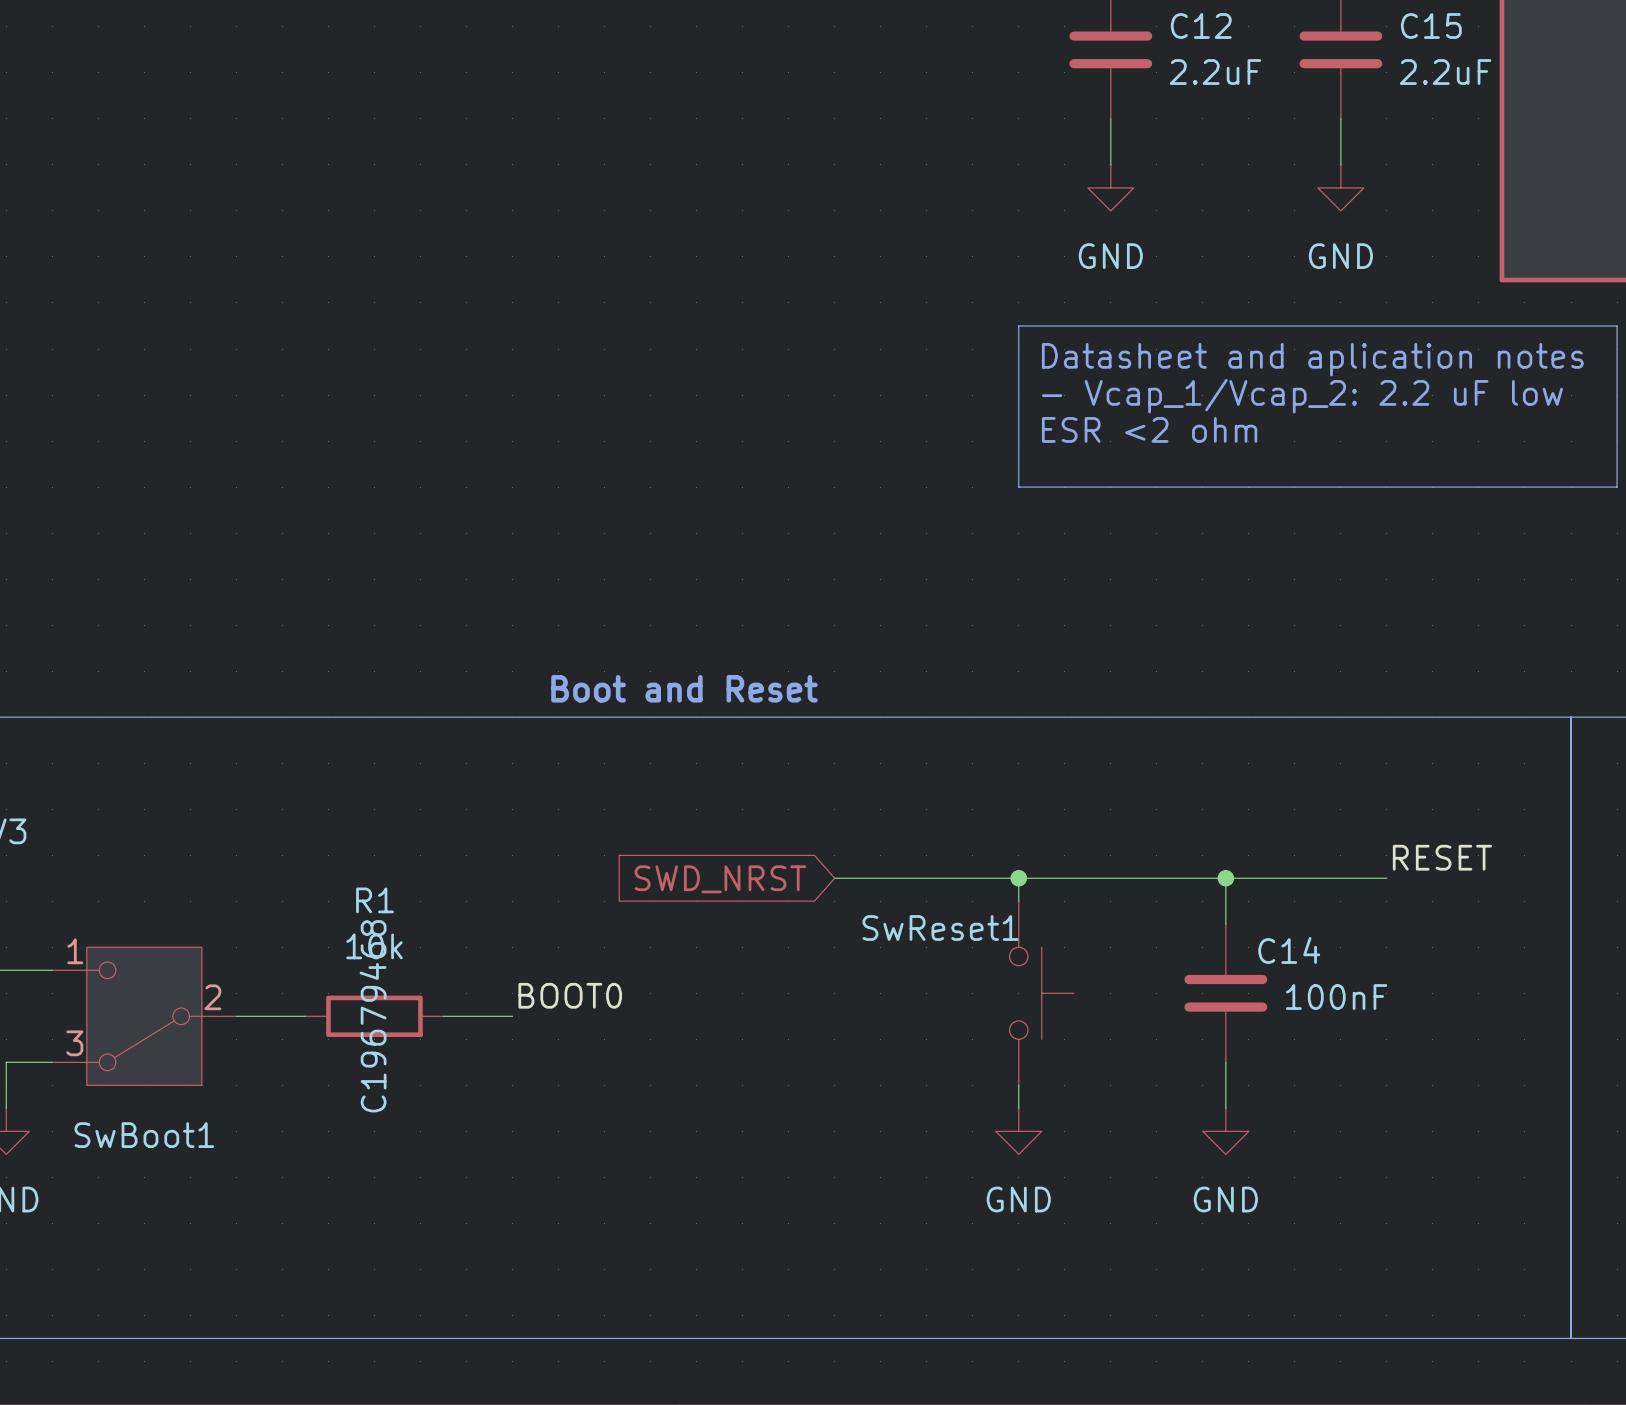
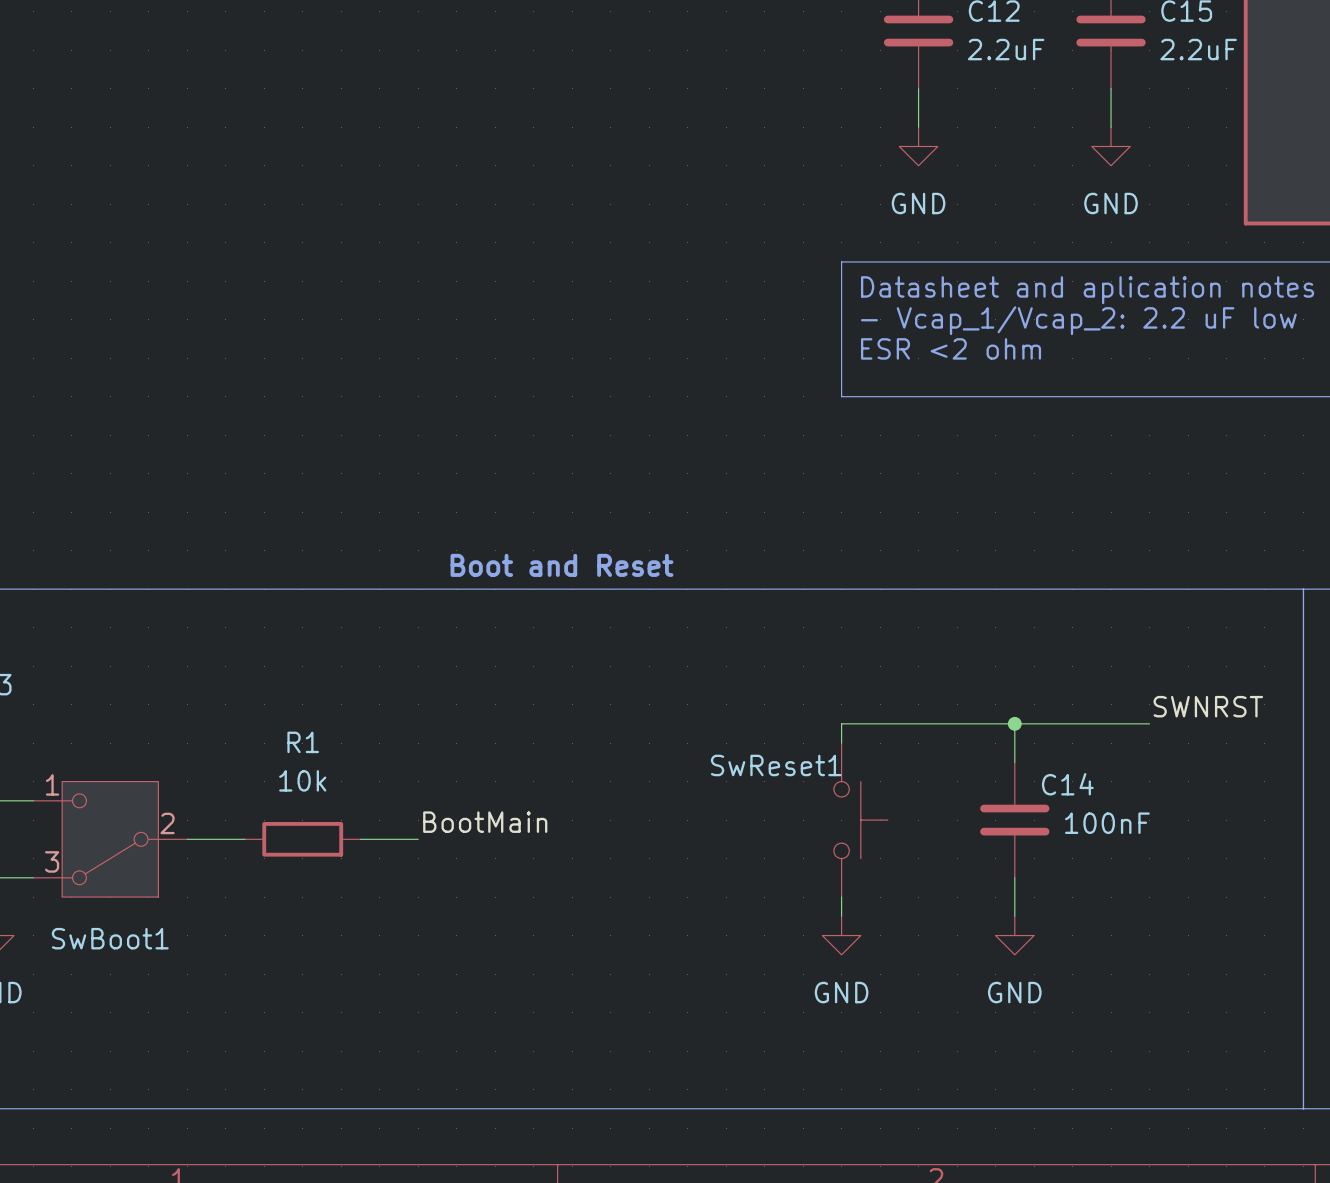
label: RESET (1442, 857) -> SWNRST (1208, 706)
wire: (834, 878) (1018, 878) -> none
junction: (1018, 878) -> none
global label: SWD_NRST (720, 879) -> none
label: BOOT0 (570, 995) -> BootMain (485, 822)
R1 text: C19679468 (373, 1016) -> none

